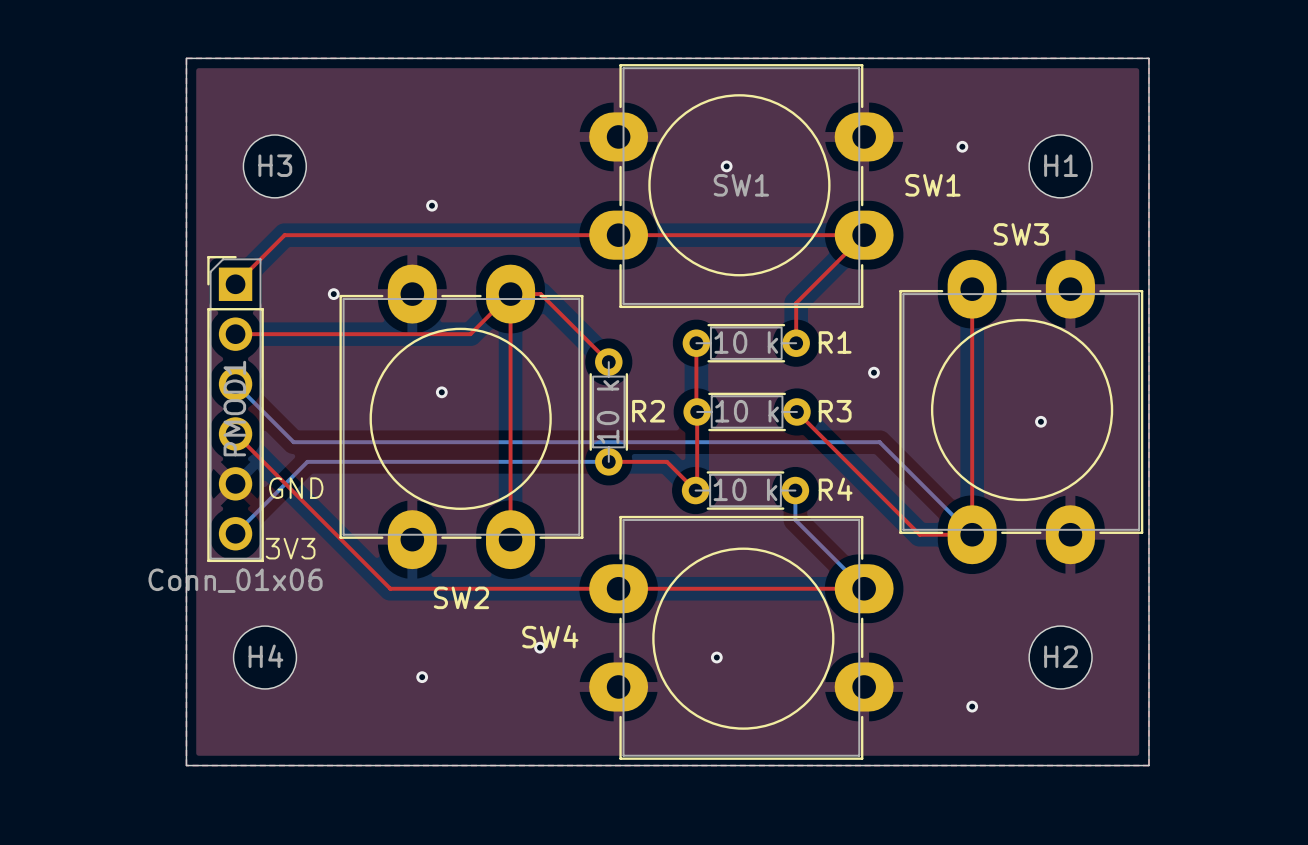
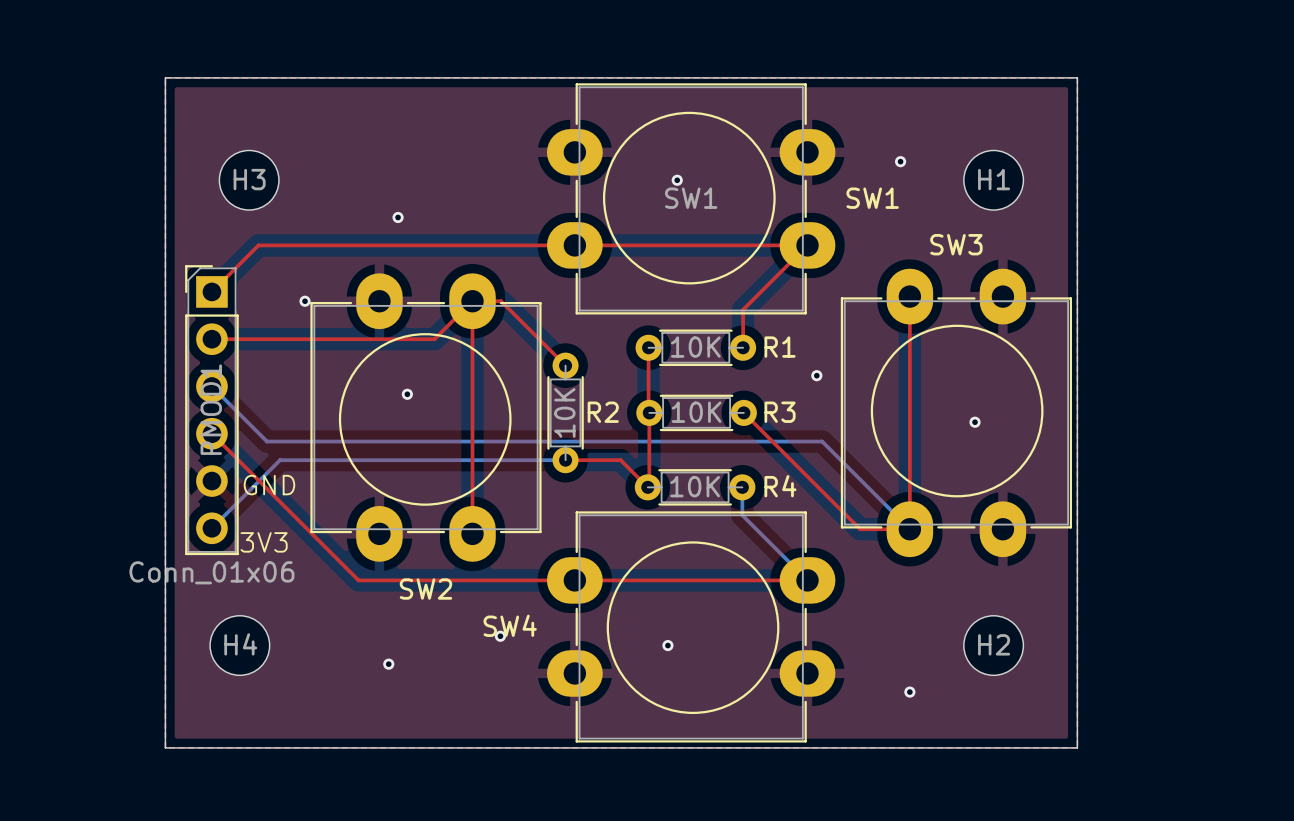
R1 value: 10 k (746, 342) -> 10K (695, 347)
R2 value: 10 k (608, 411) -> 10K (564, 412)
R3 value: 10 k (747, 411) -> 10K (696, 412)
R4 value: 10 k (745, 489) -> 10K (695, 486)

